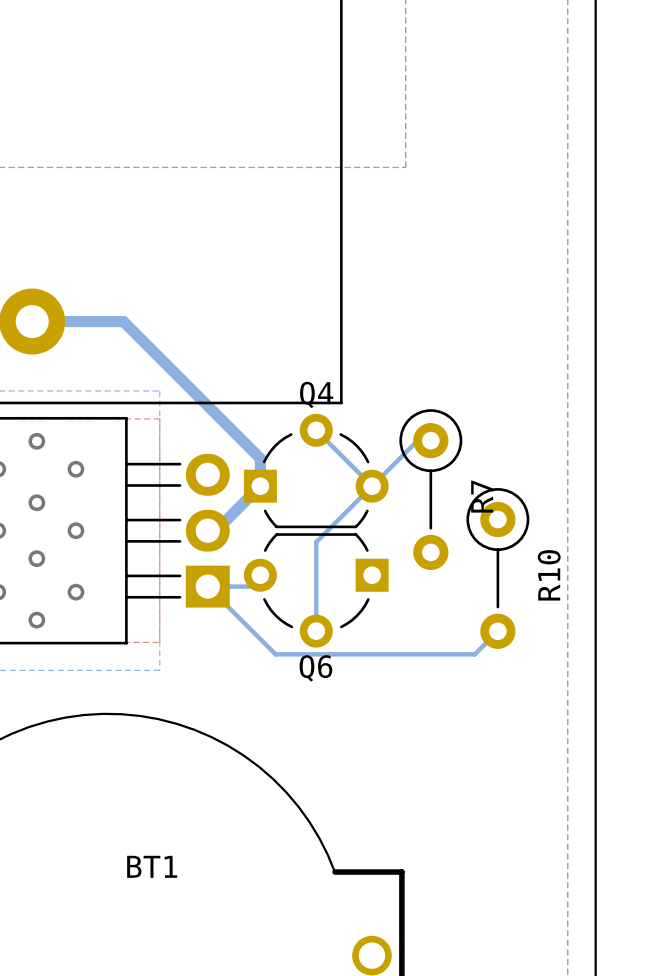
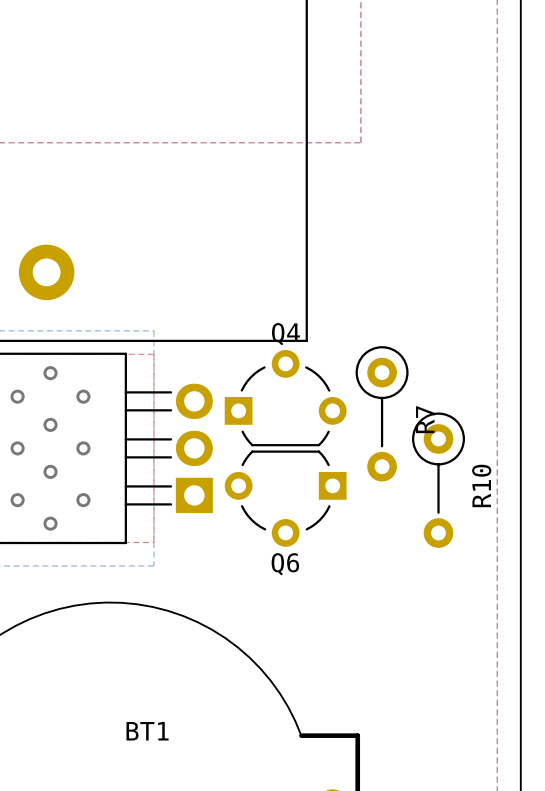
bottom track: (32, 321) (123, 321) (260, 458) (260, 486) (215, 530) (207, 530) -> none
bottom track: (316, 430) (372, 486) -> none
bottom track: (430, 440) (417, 440) (316, 542) (316, 631) -> none
bottom track: (260, 575) (249, 586) (207, 586) (275, 654) (474, 654) (497, 631) -> none

